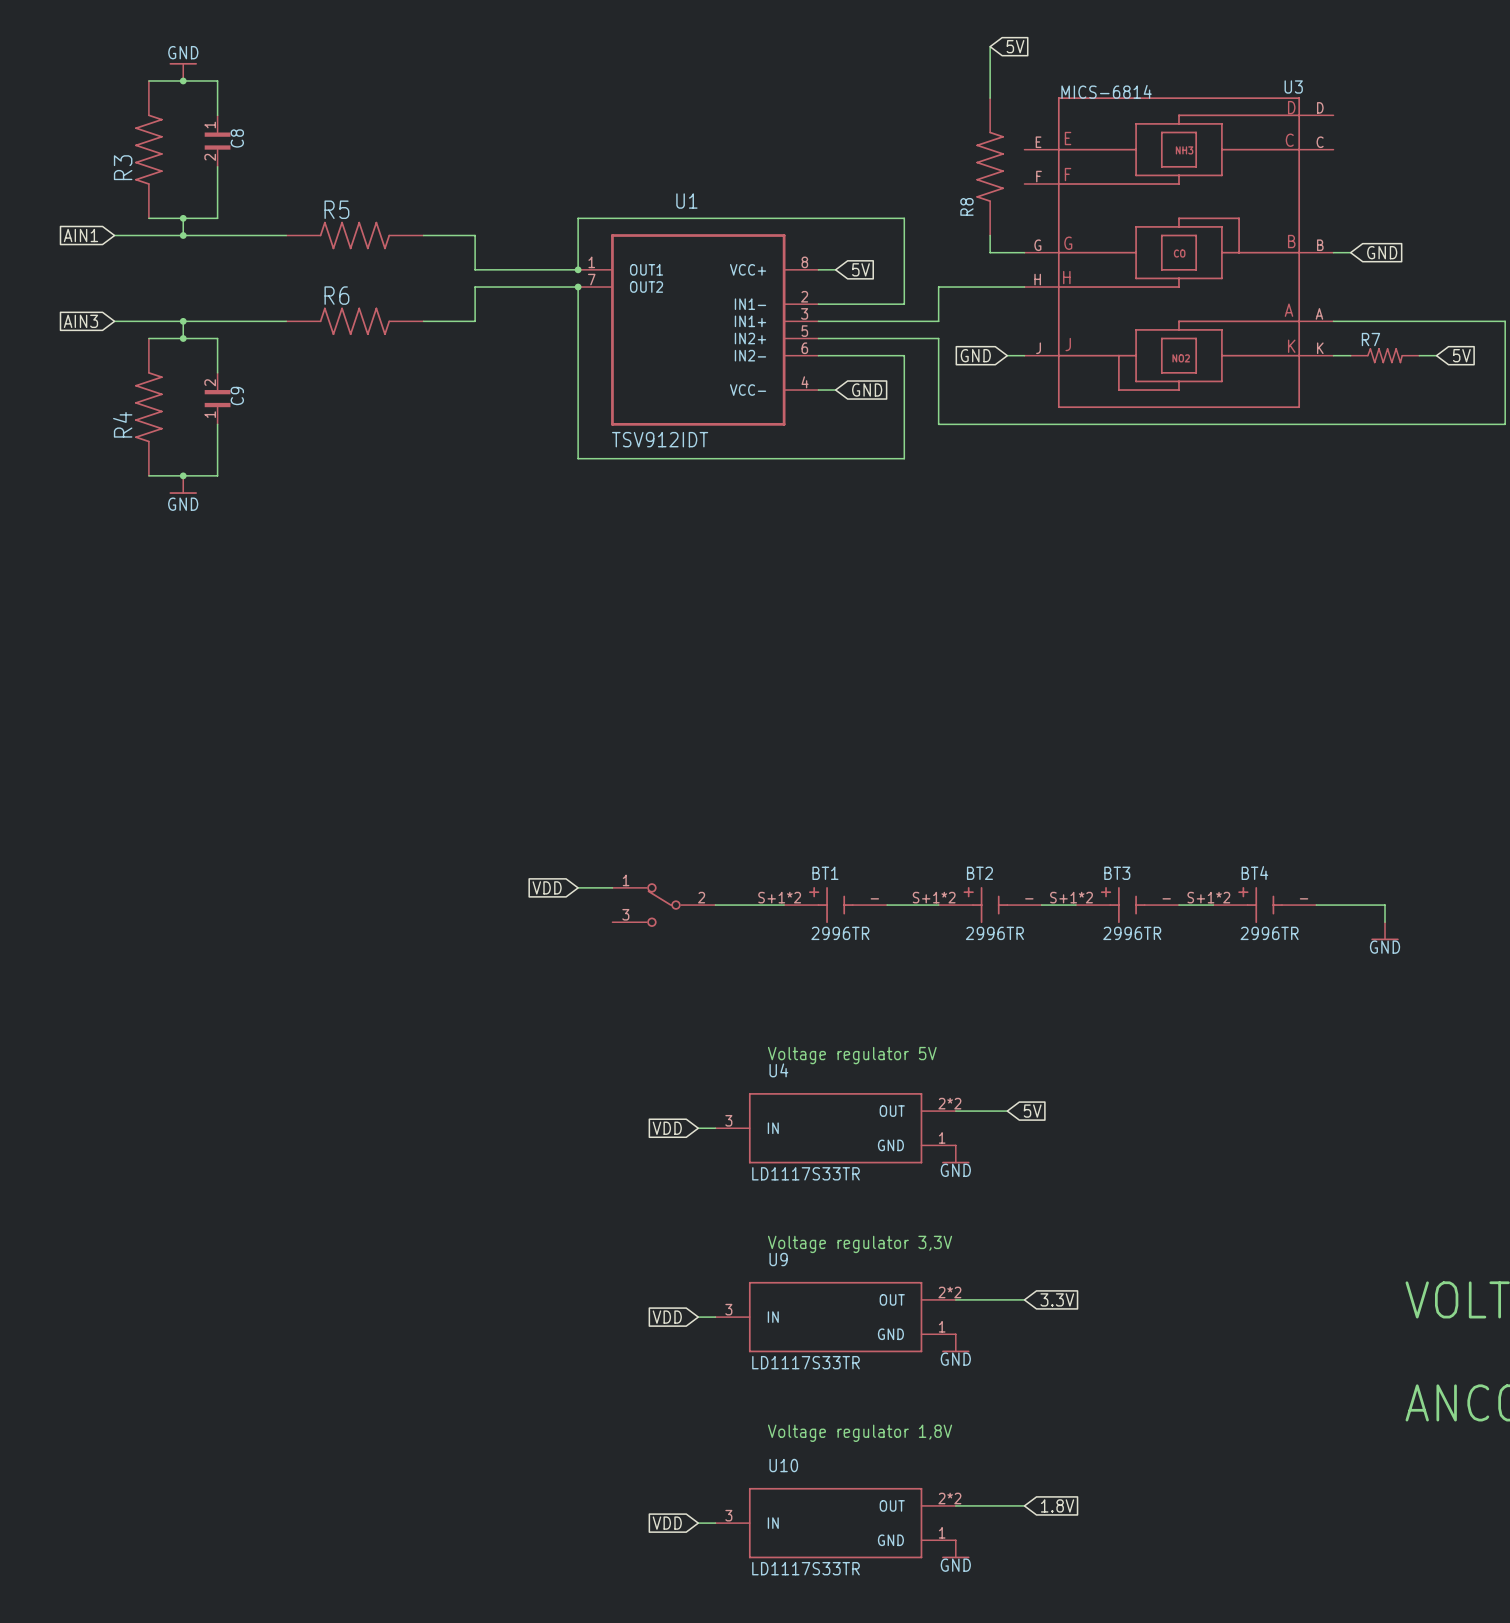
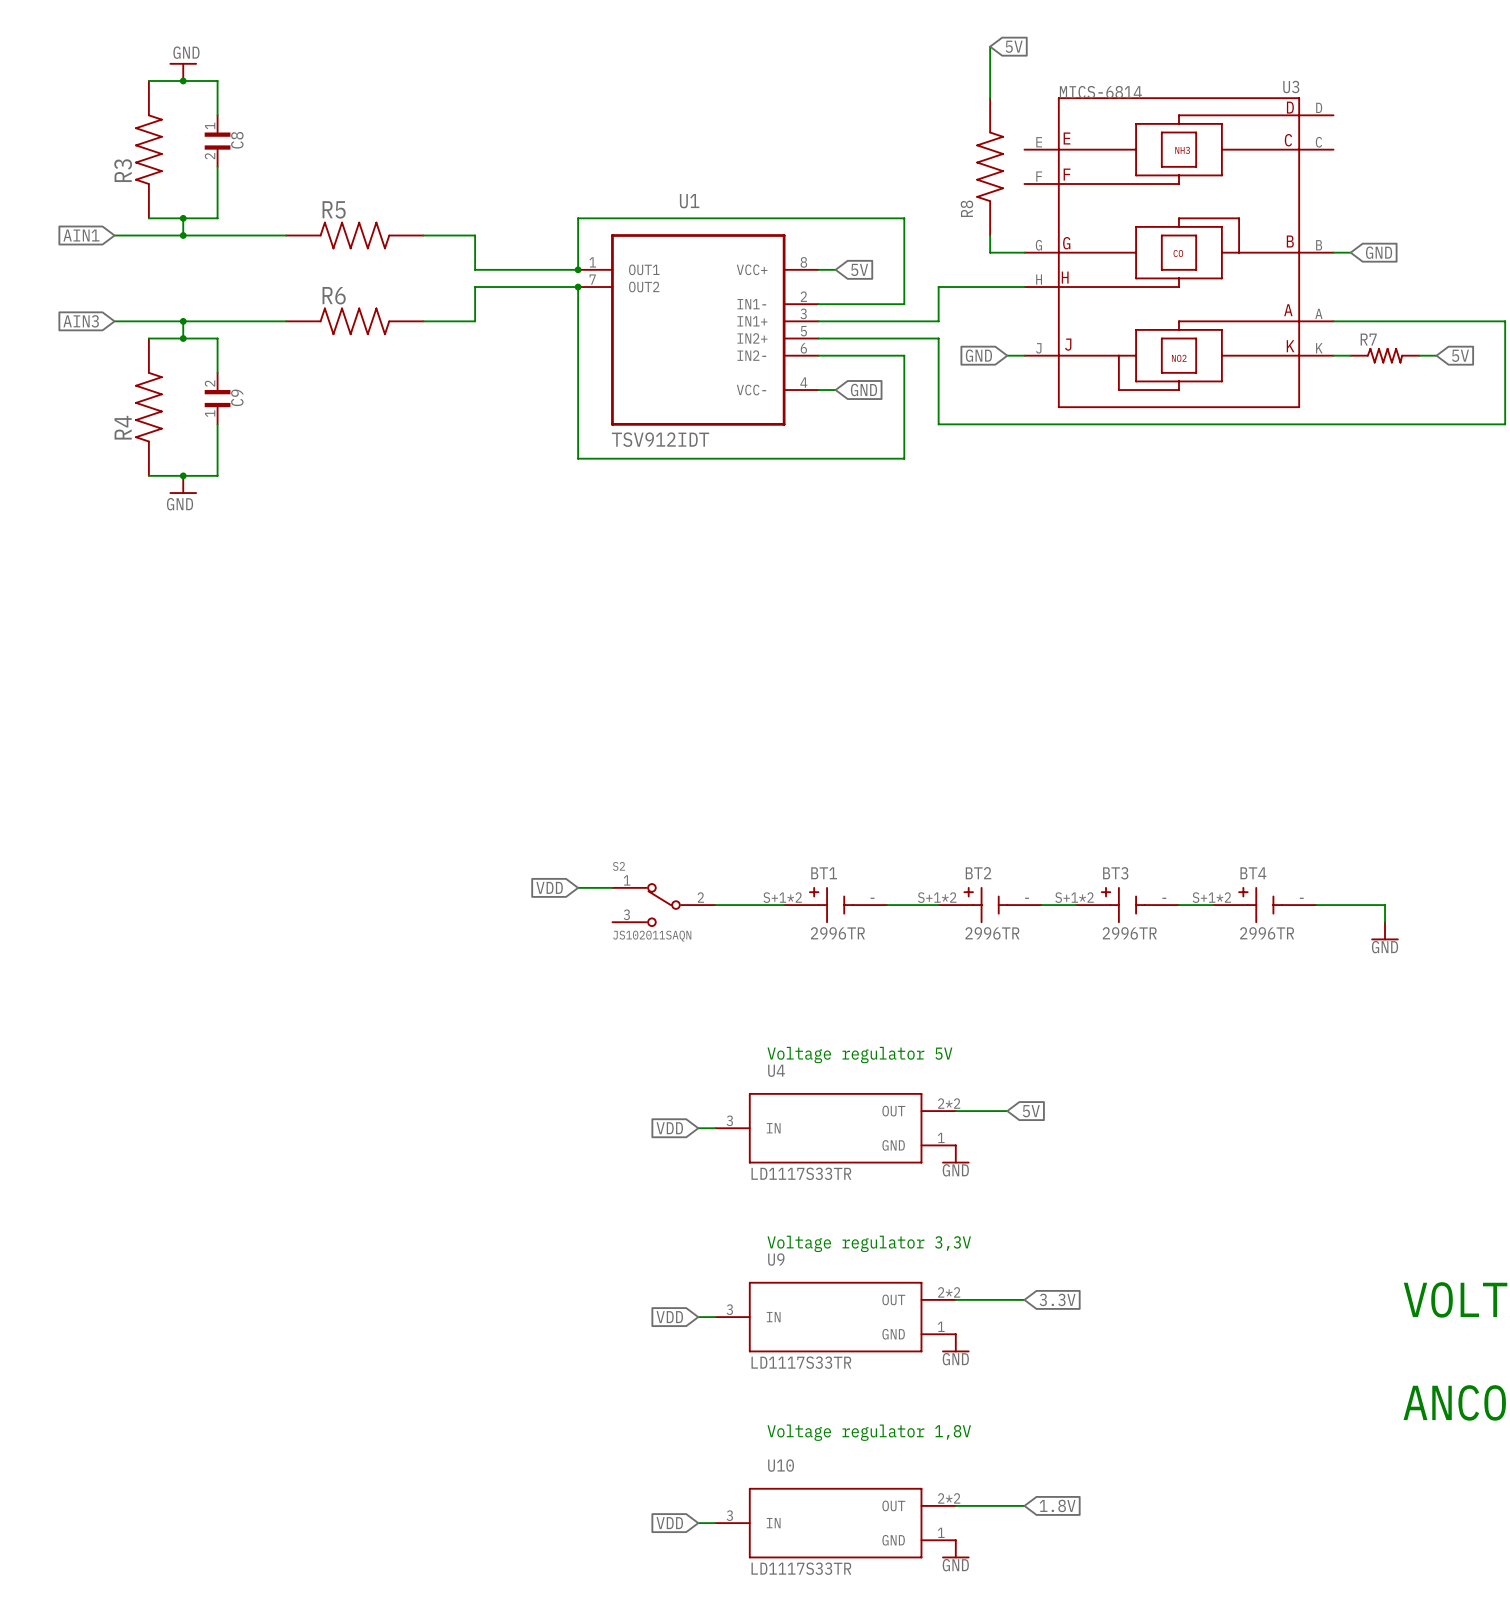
S2 name: none -> S2 (618, 866)
S2 value: none -> JS102011SAQN (652, 936)

